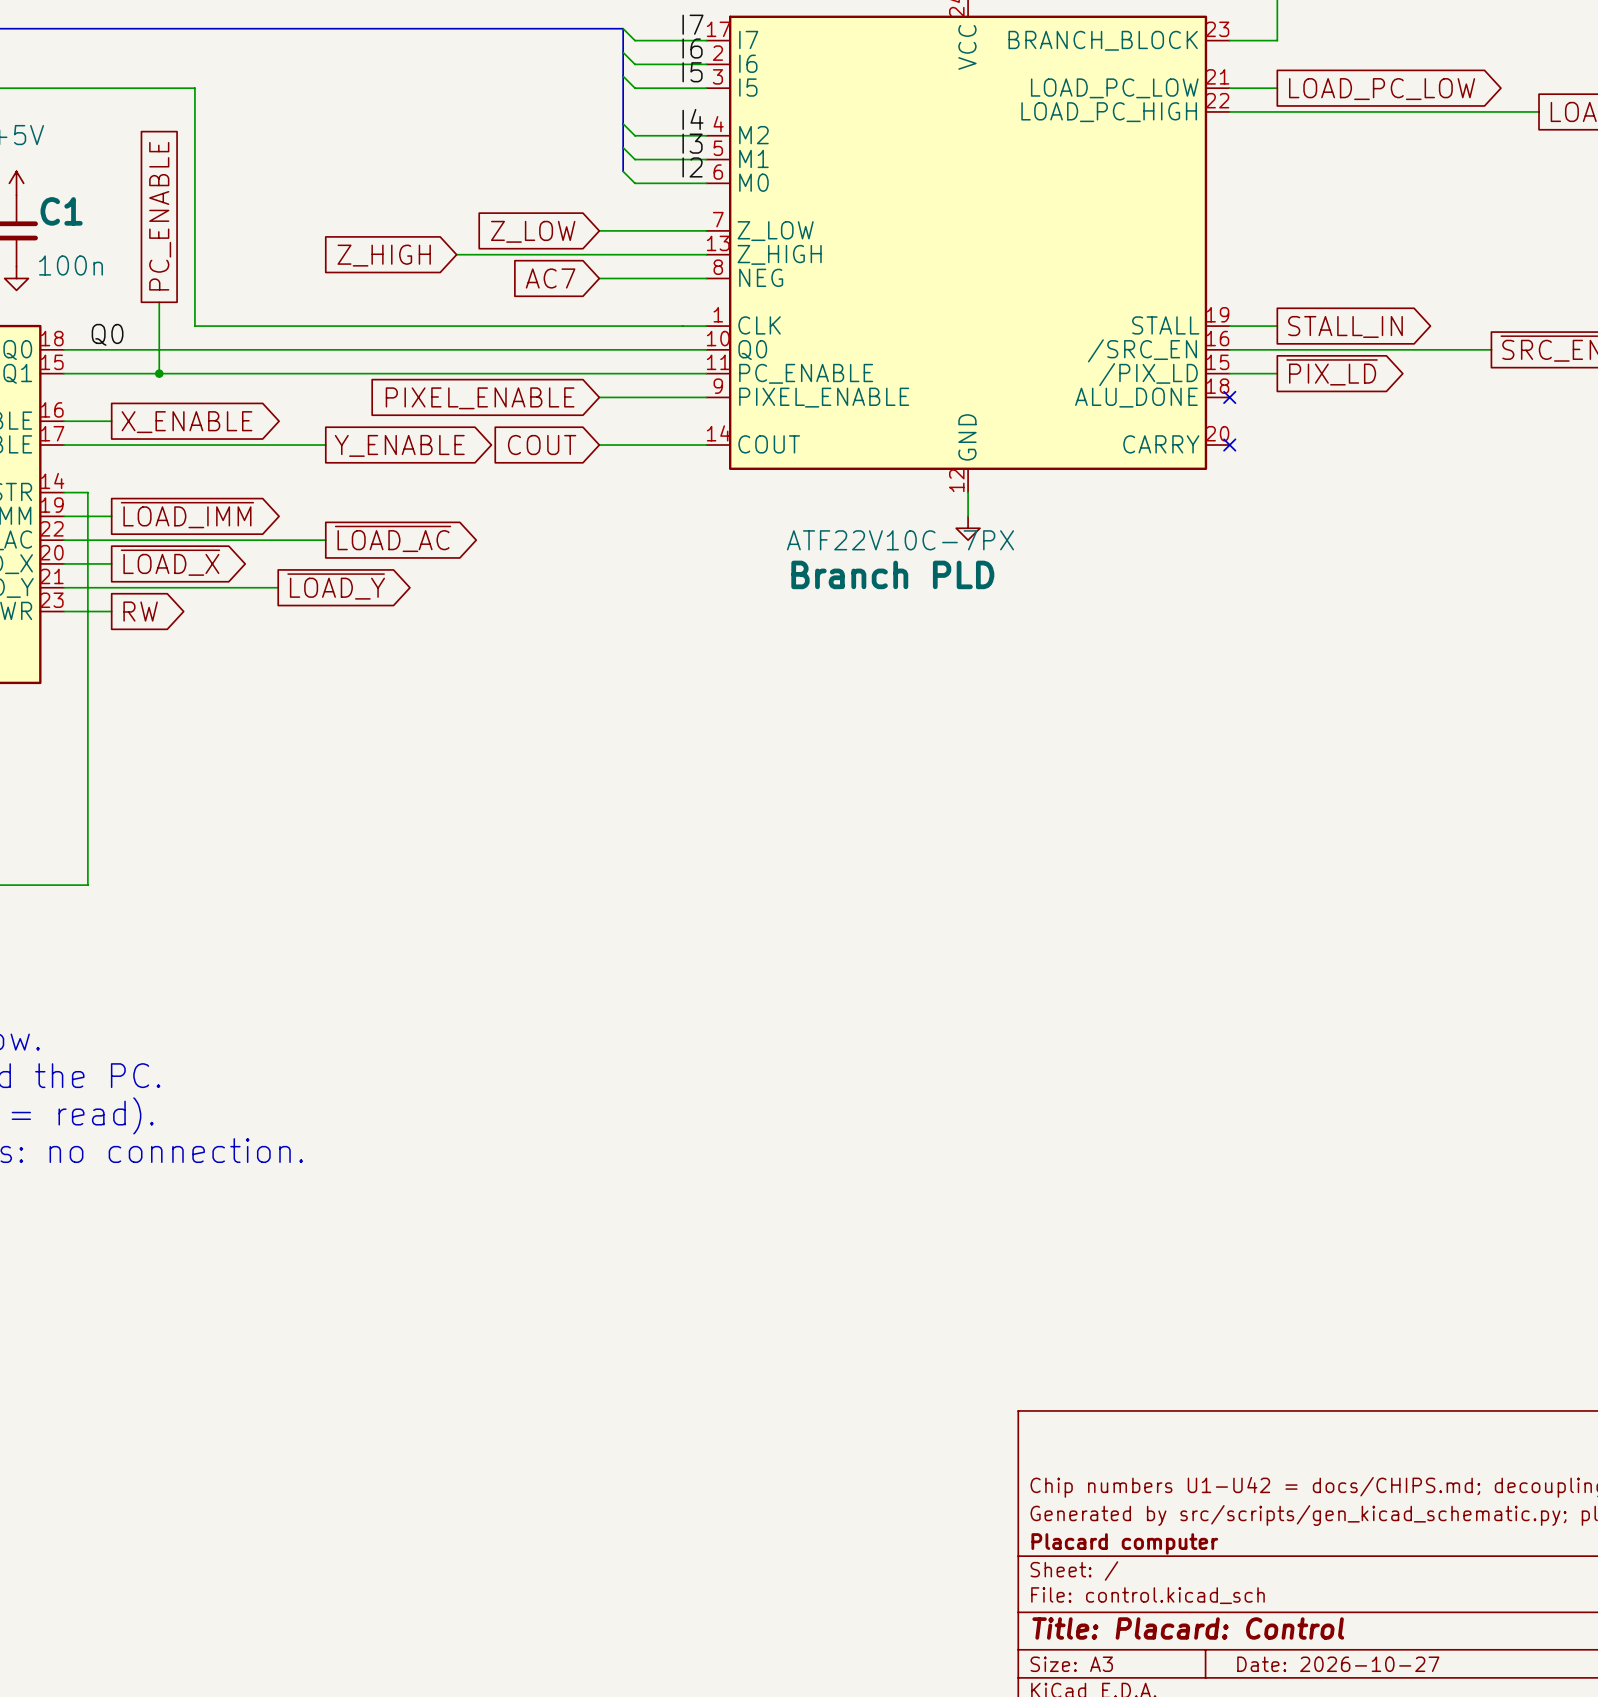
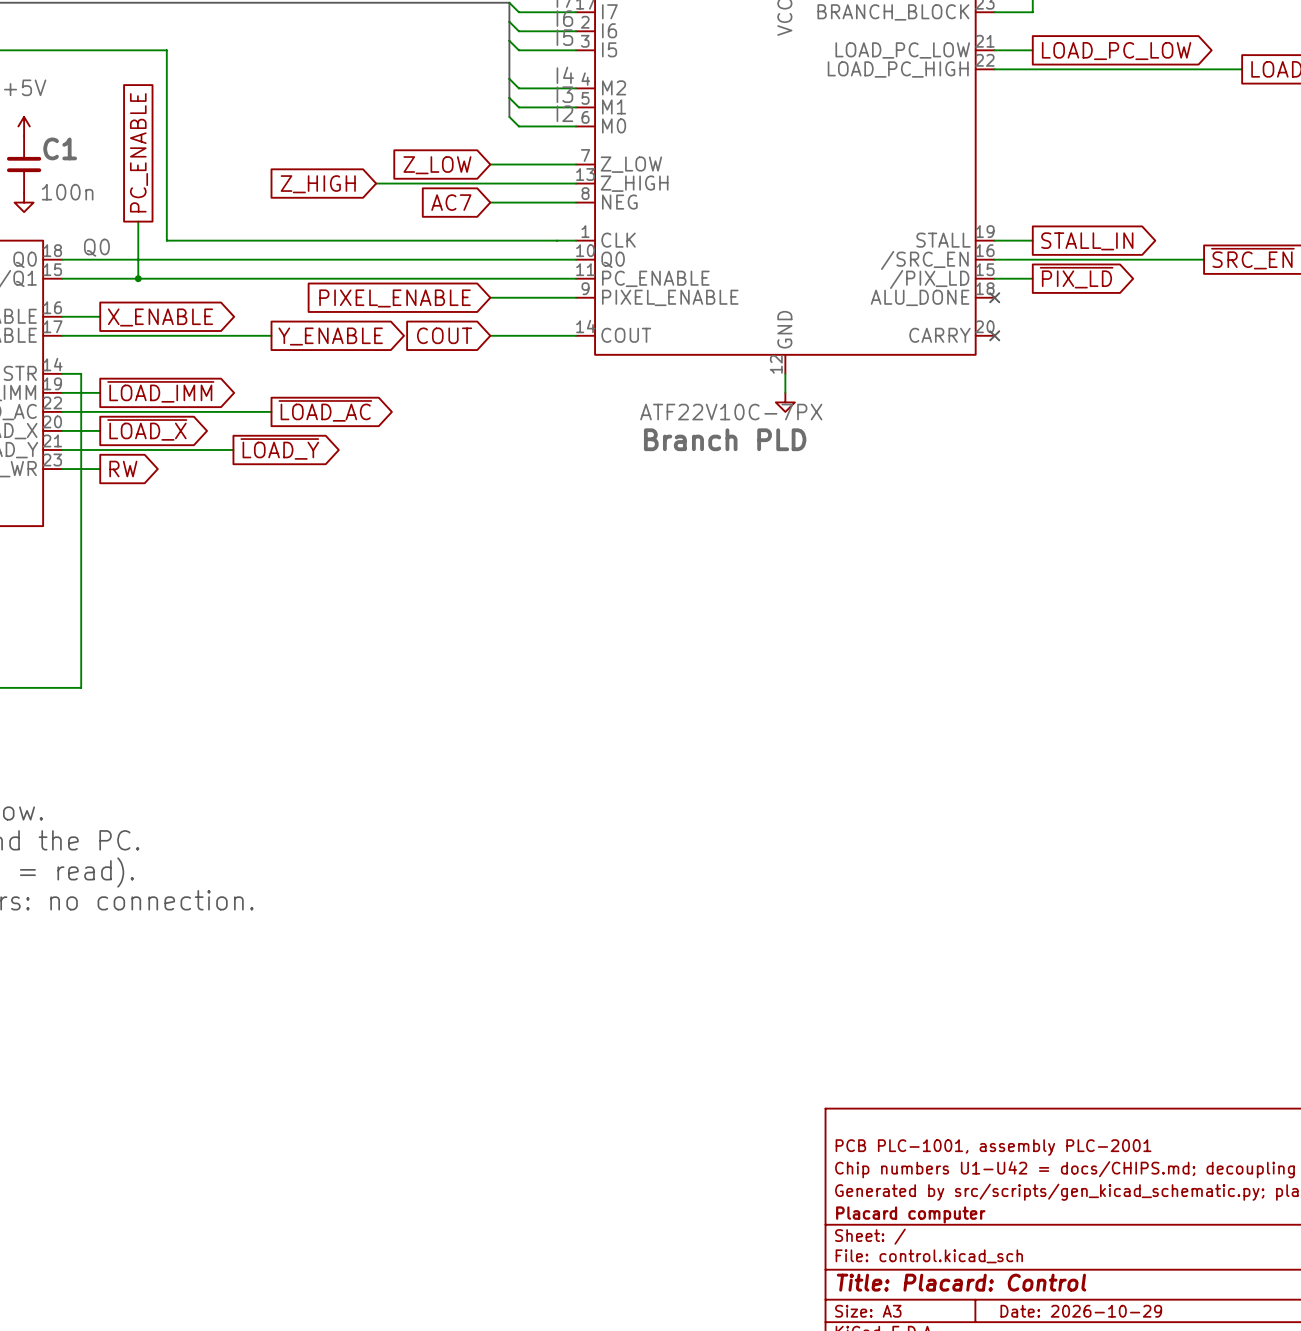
title block: none -> PCB PLC-1001, assembly PLC-2001 (993, 1147)
title block: Date: 2026-10-27 (1338, 1664) -> Date: 2026-10-29 (1081, 1311)

